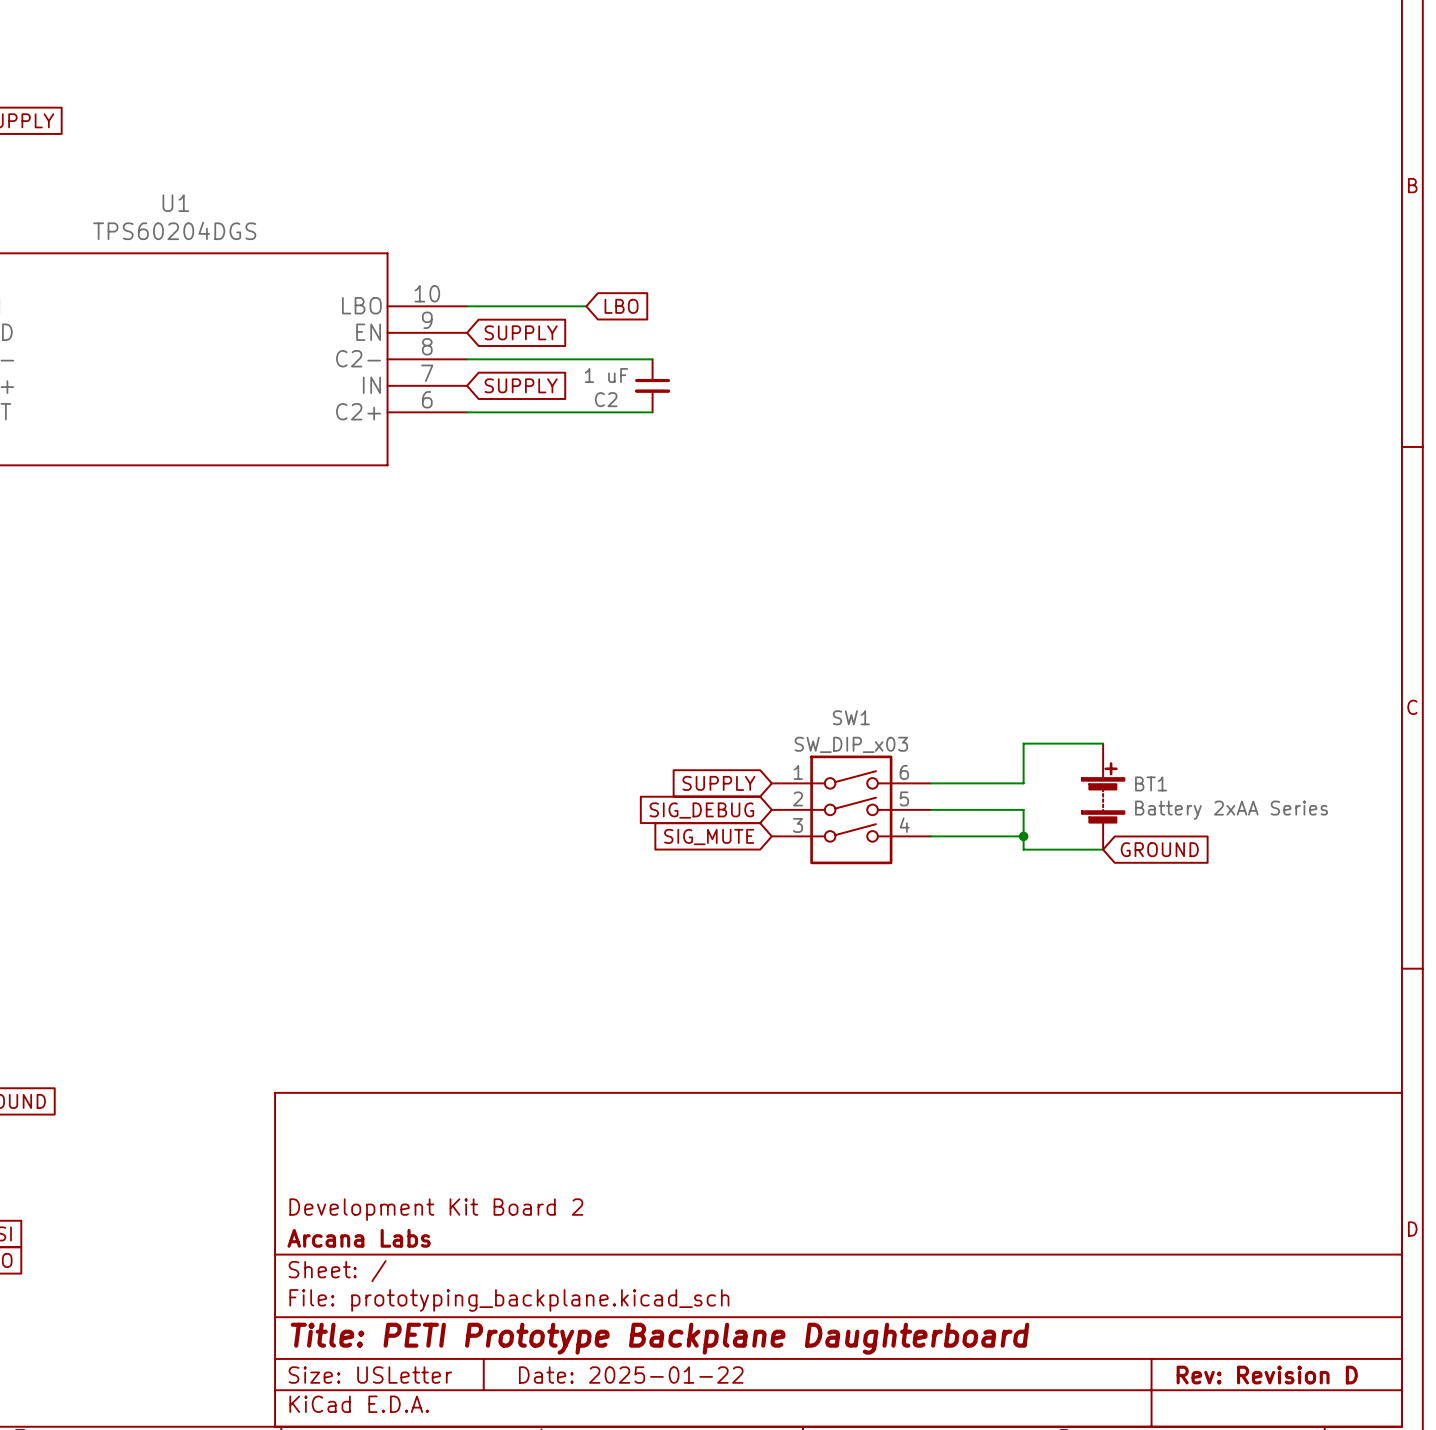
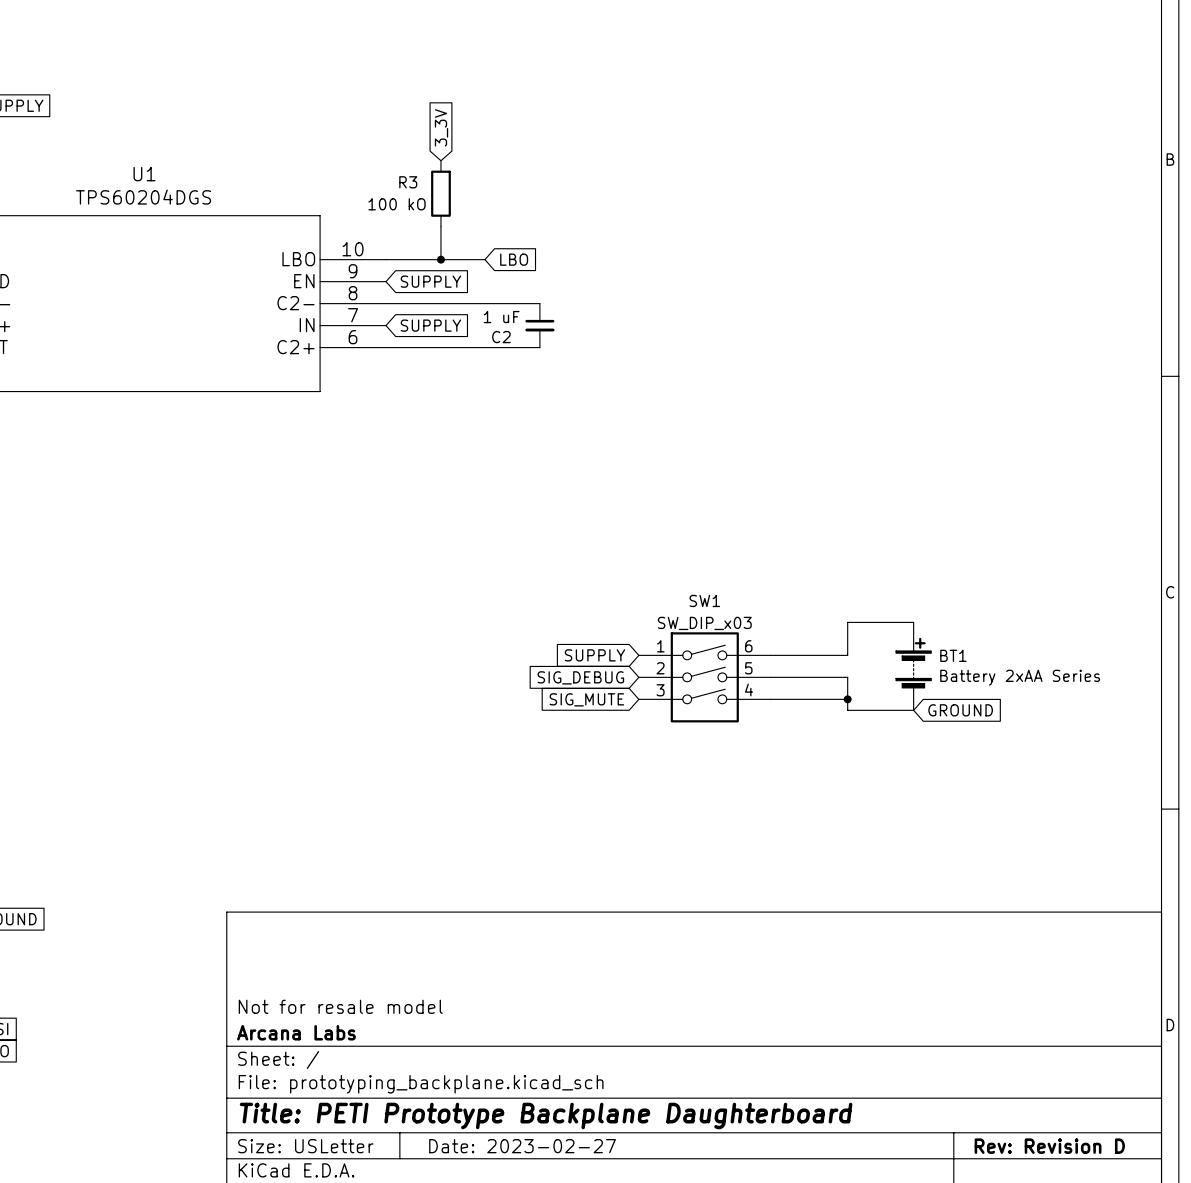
global label: none -> 3_3V (441, 127)
R3: none -> 100 kO (440, 193)
wire: none -> (440, 226) (440, 259)
junction: none -> (440, 259)
title block: Development Kit Board 2 (436, 1209) -> Not for resale model (340, 1006)
title block: Date: 2025-01-22 (631, 1375) -> Date: 2023-02-27 (522, 1146)

